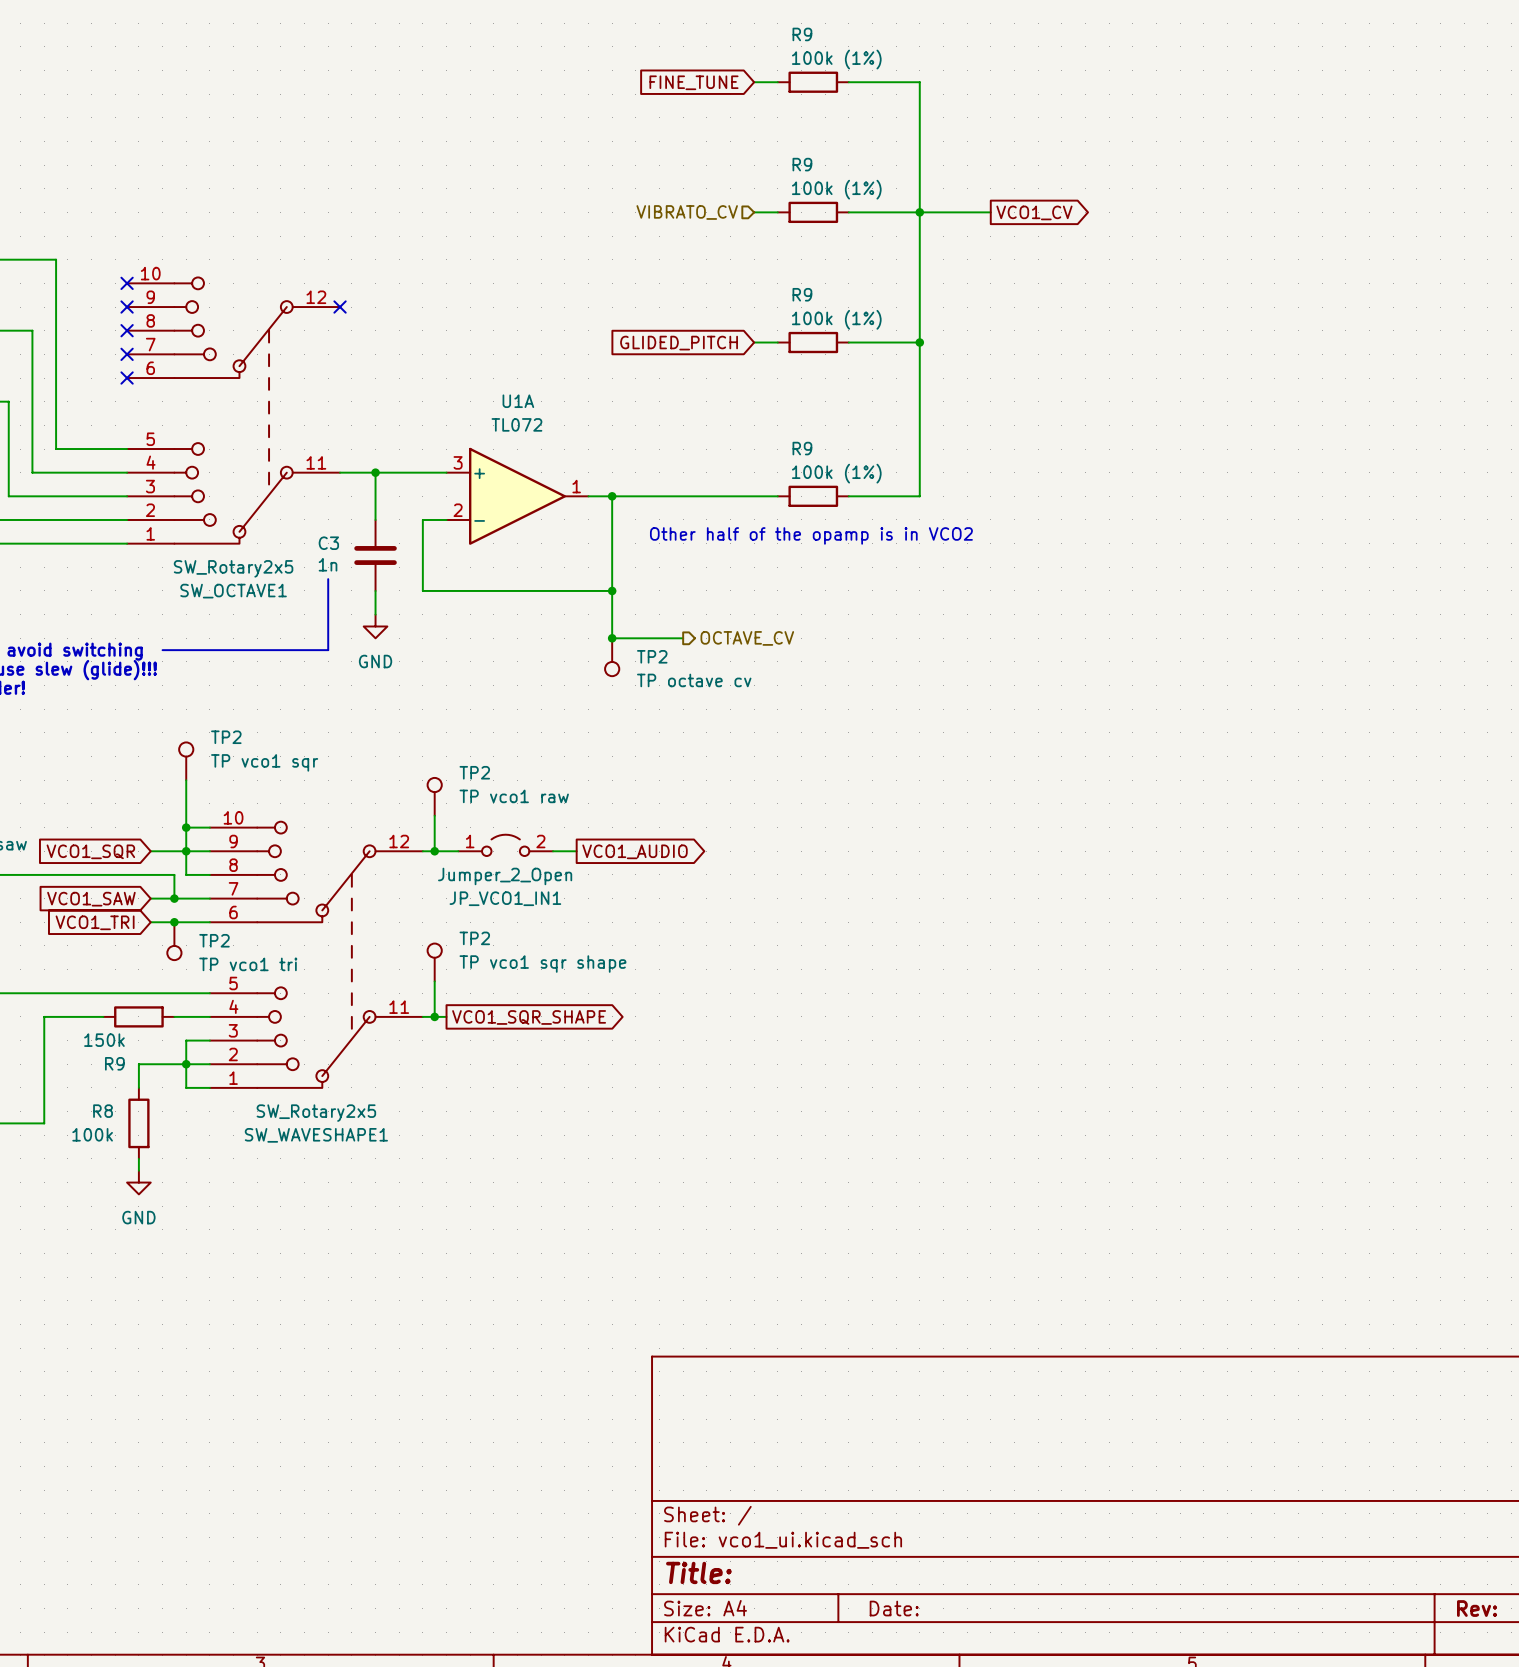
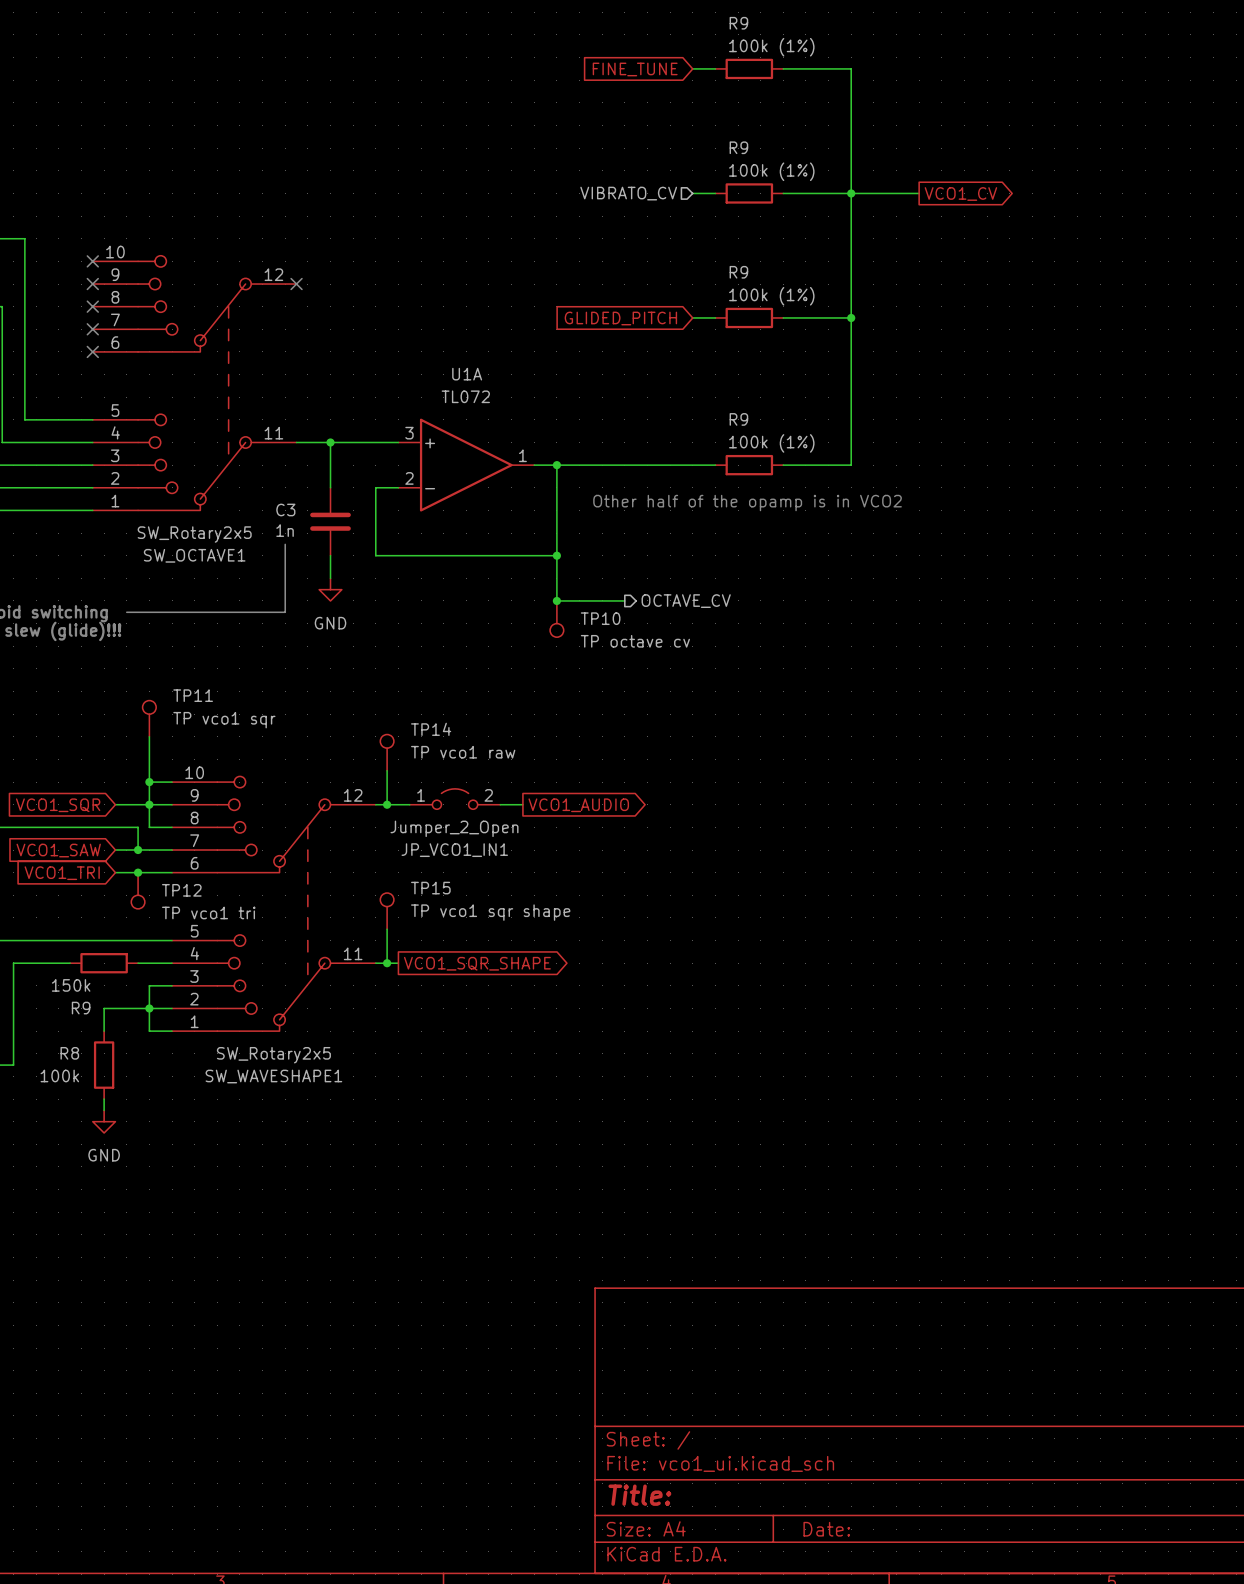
TP2 name: TP2 (652, 656) -> TP10 (600, 618)
TP2 name: TP2 (226, 737) -> TP11 (193, 695)
TP2 name: TP2 (474, 772) -> TP14 (431, 729)
TP2 name: TP2 (474, 938) -> TP15 (430, 888)
TP2 name: TP2 (214, 940) -> TP12 (181, 890)

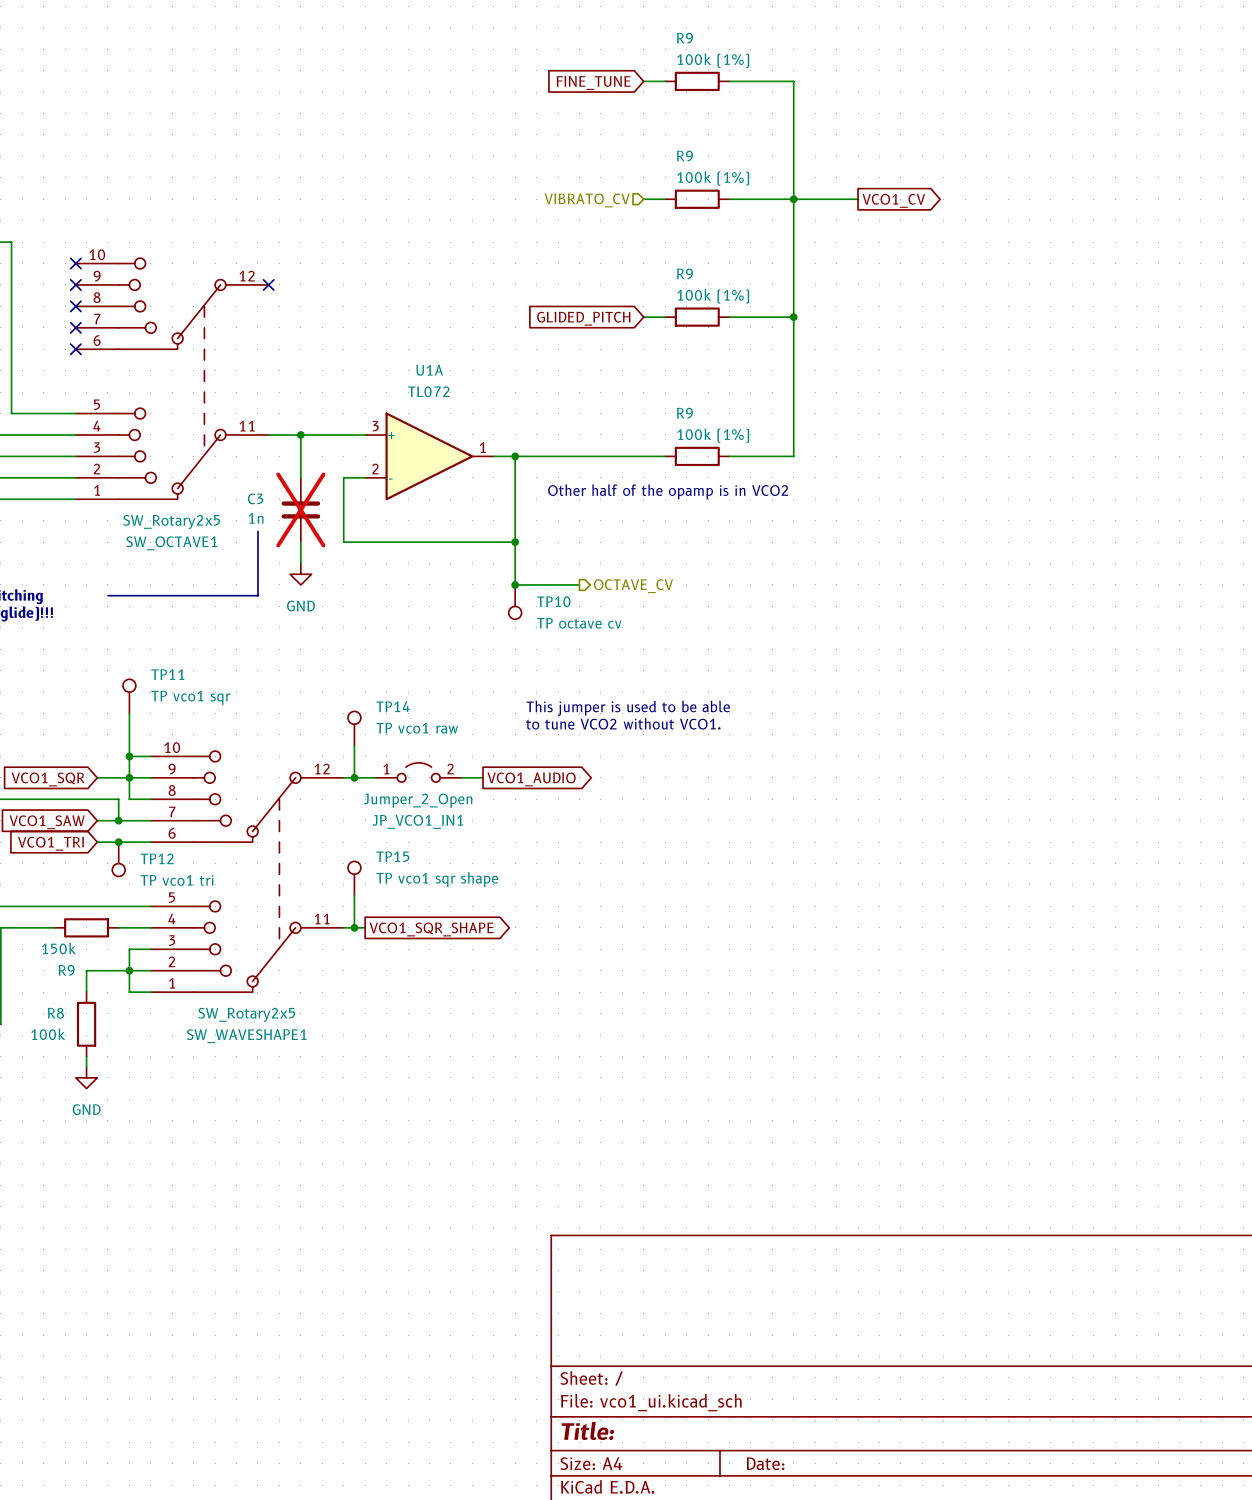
C3 do-not-place cross: none -> (300, 509)
text: none -> This jumper is used to be able (628, 708)
text: none -> to tune VCO2 without VCO1. (623, 723)

